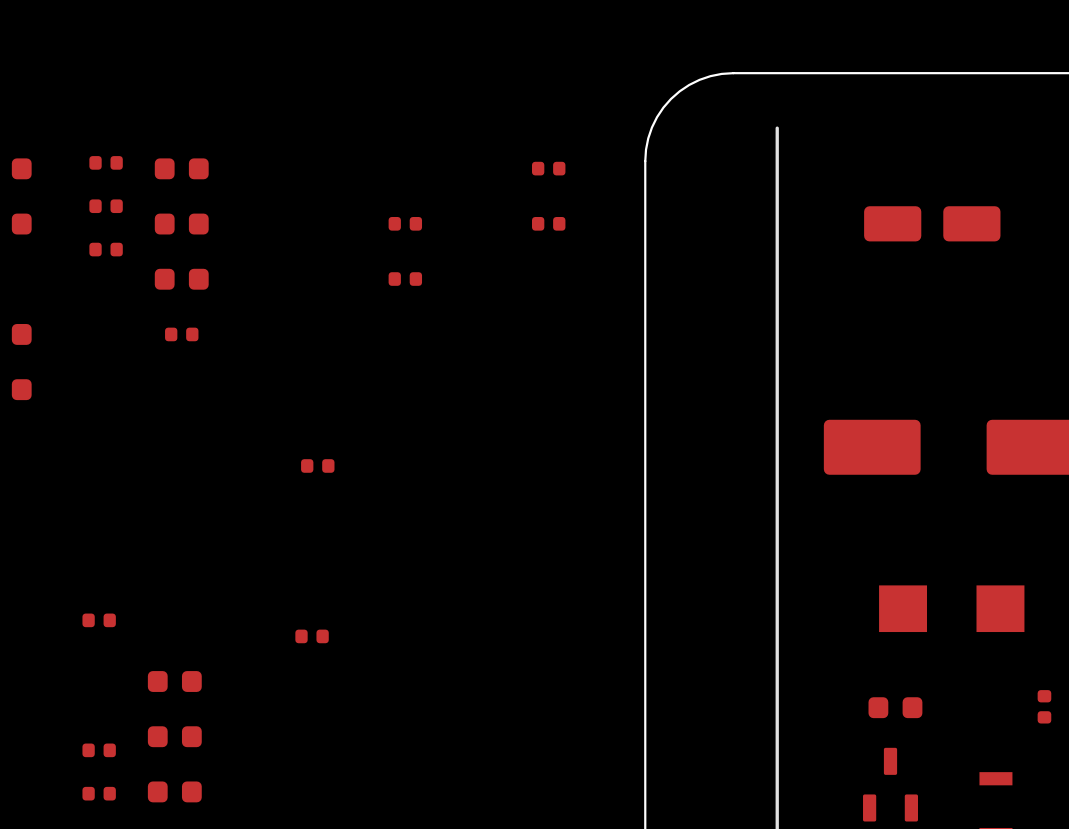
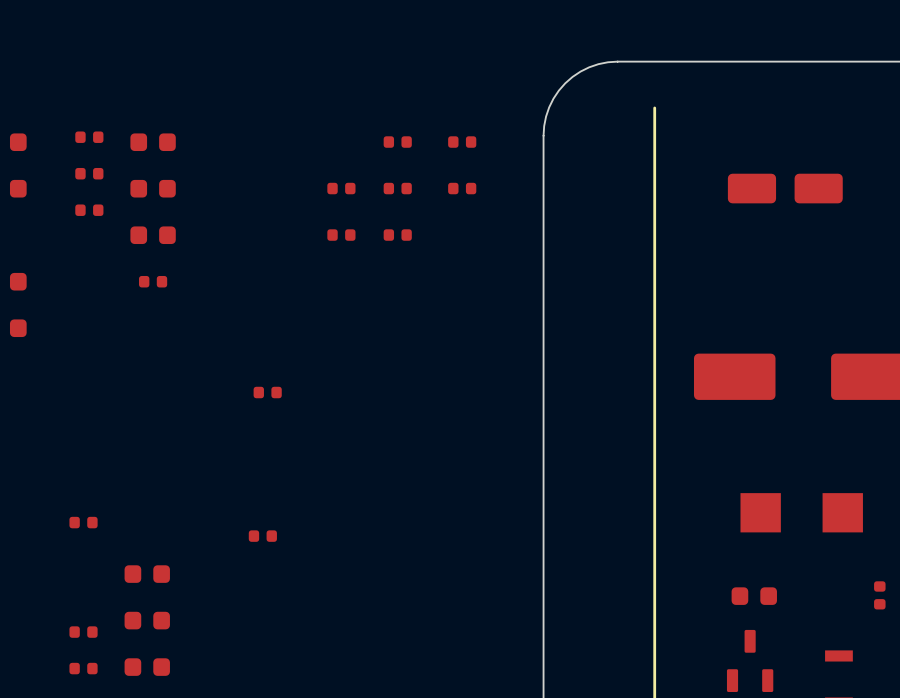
part: none -> (397, 142)
part: none -> (397, 188)
part: none -> (397, 235)

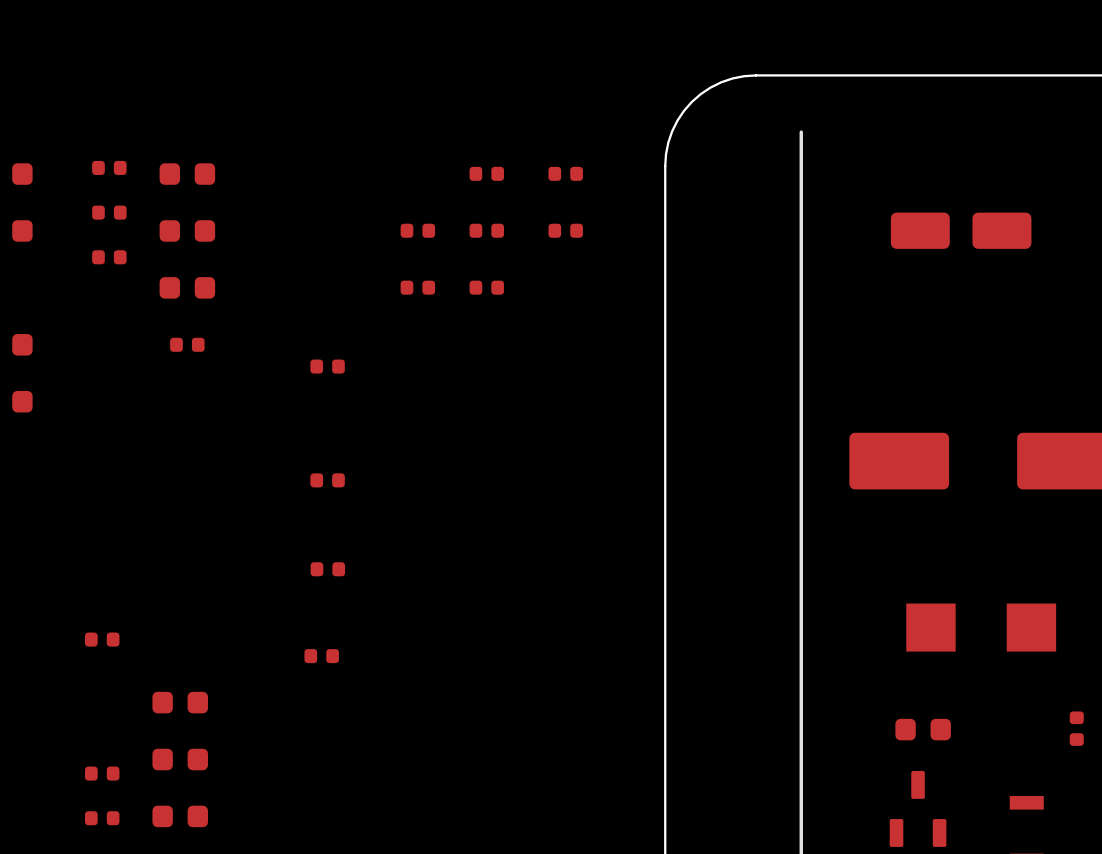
part: none -> (327, 366)
part: none -> (327, 569)

